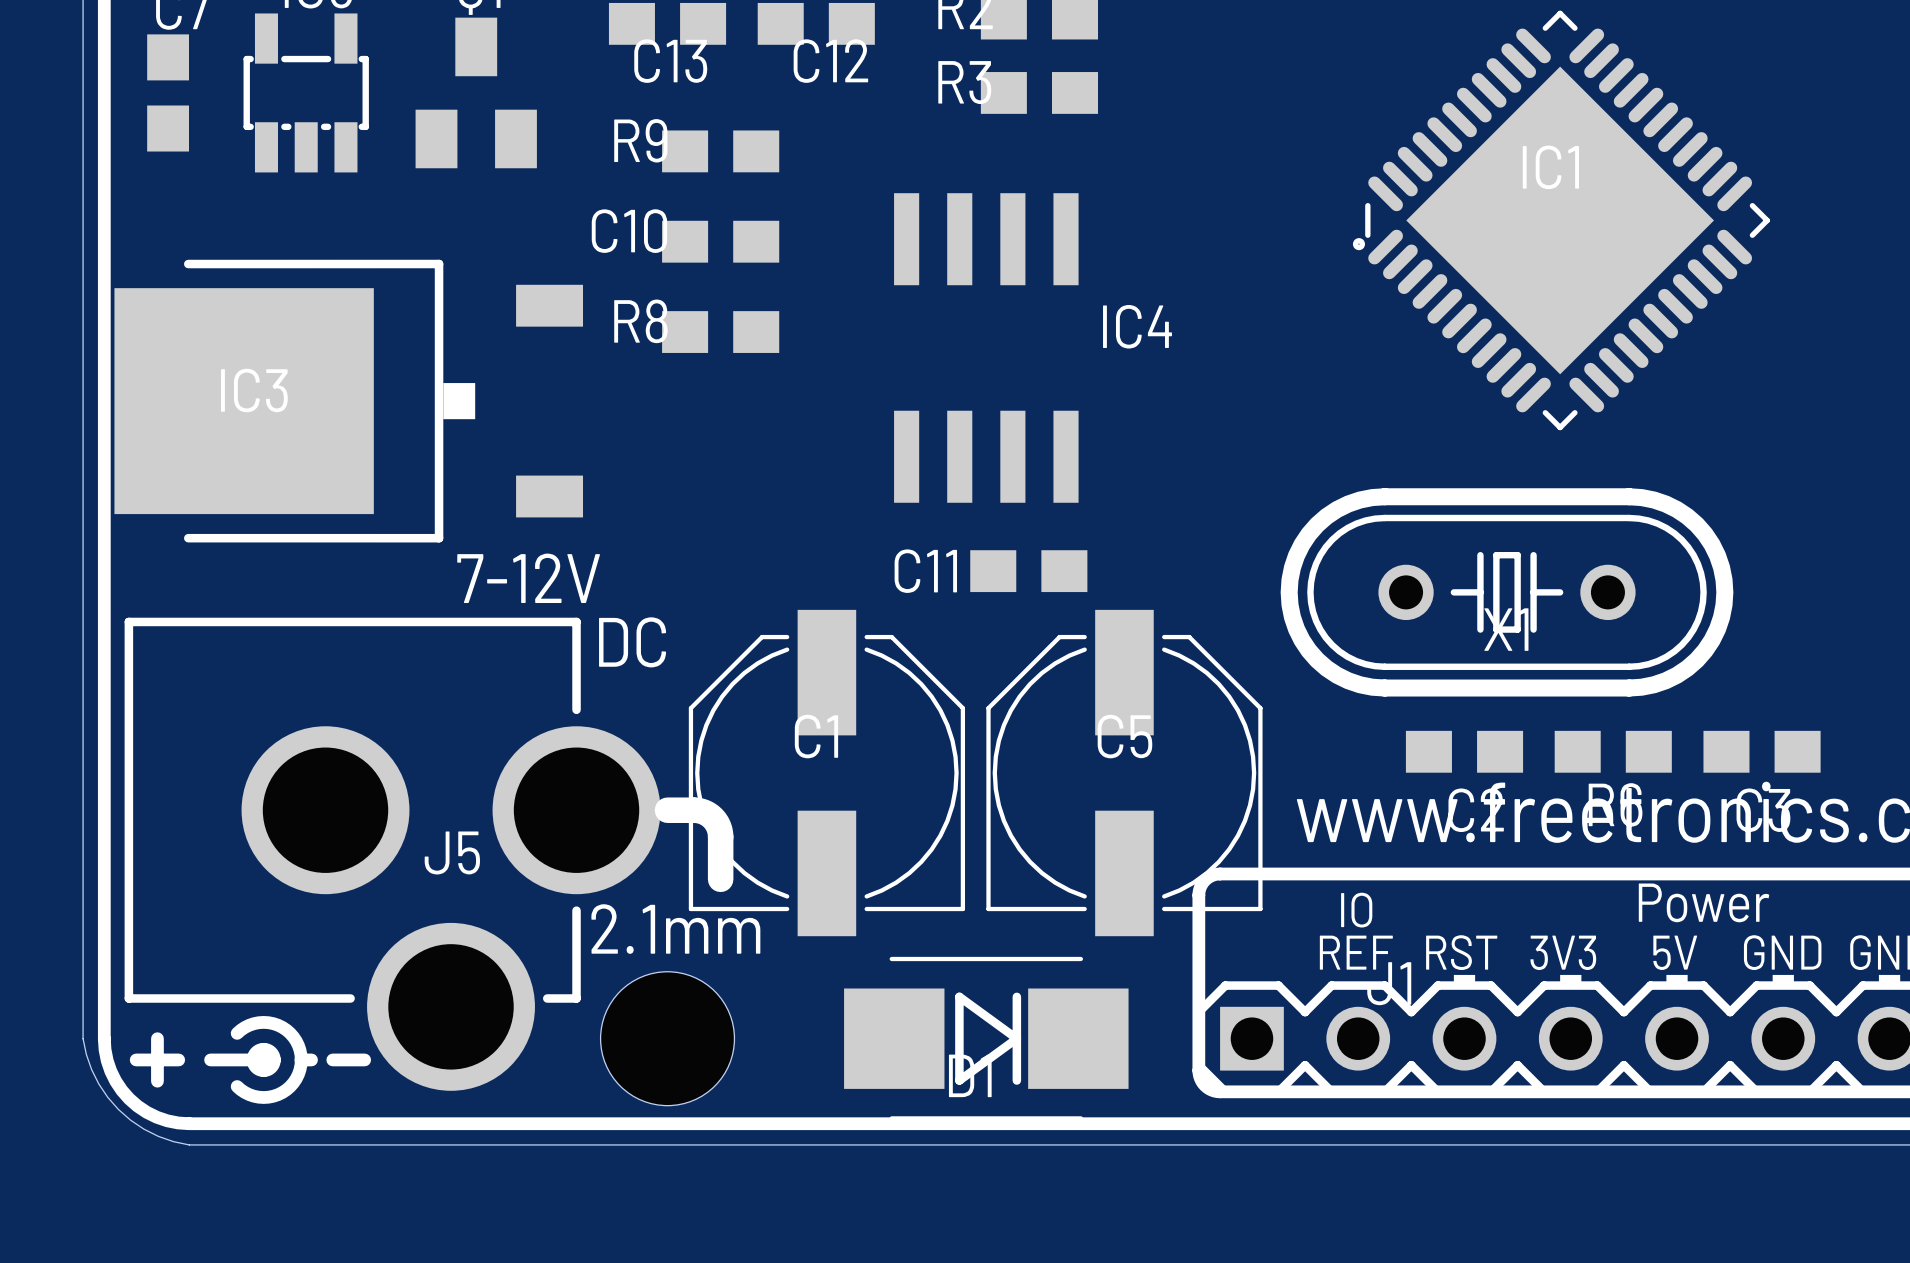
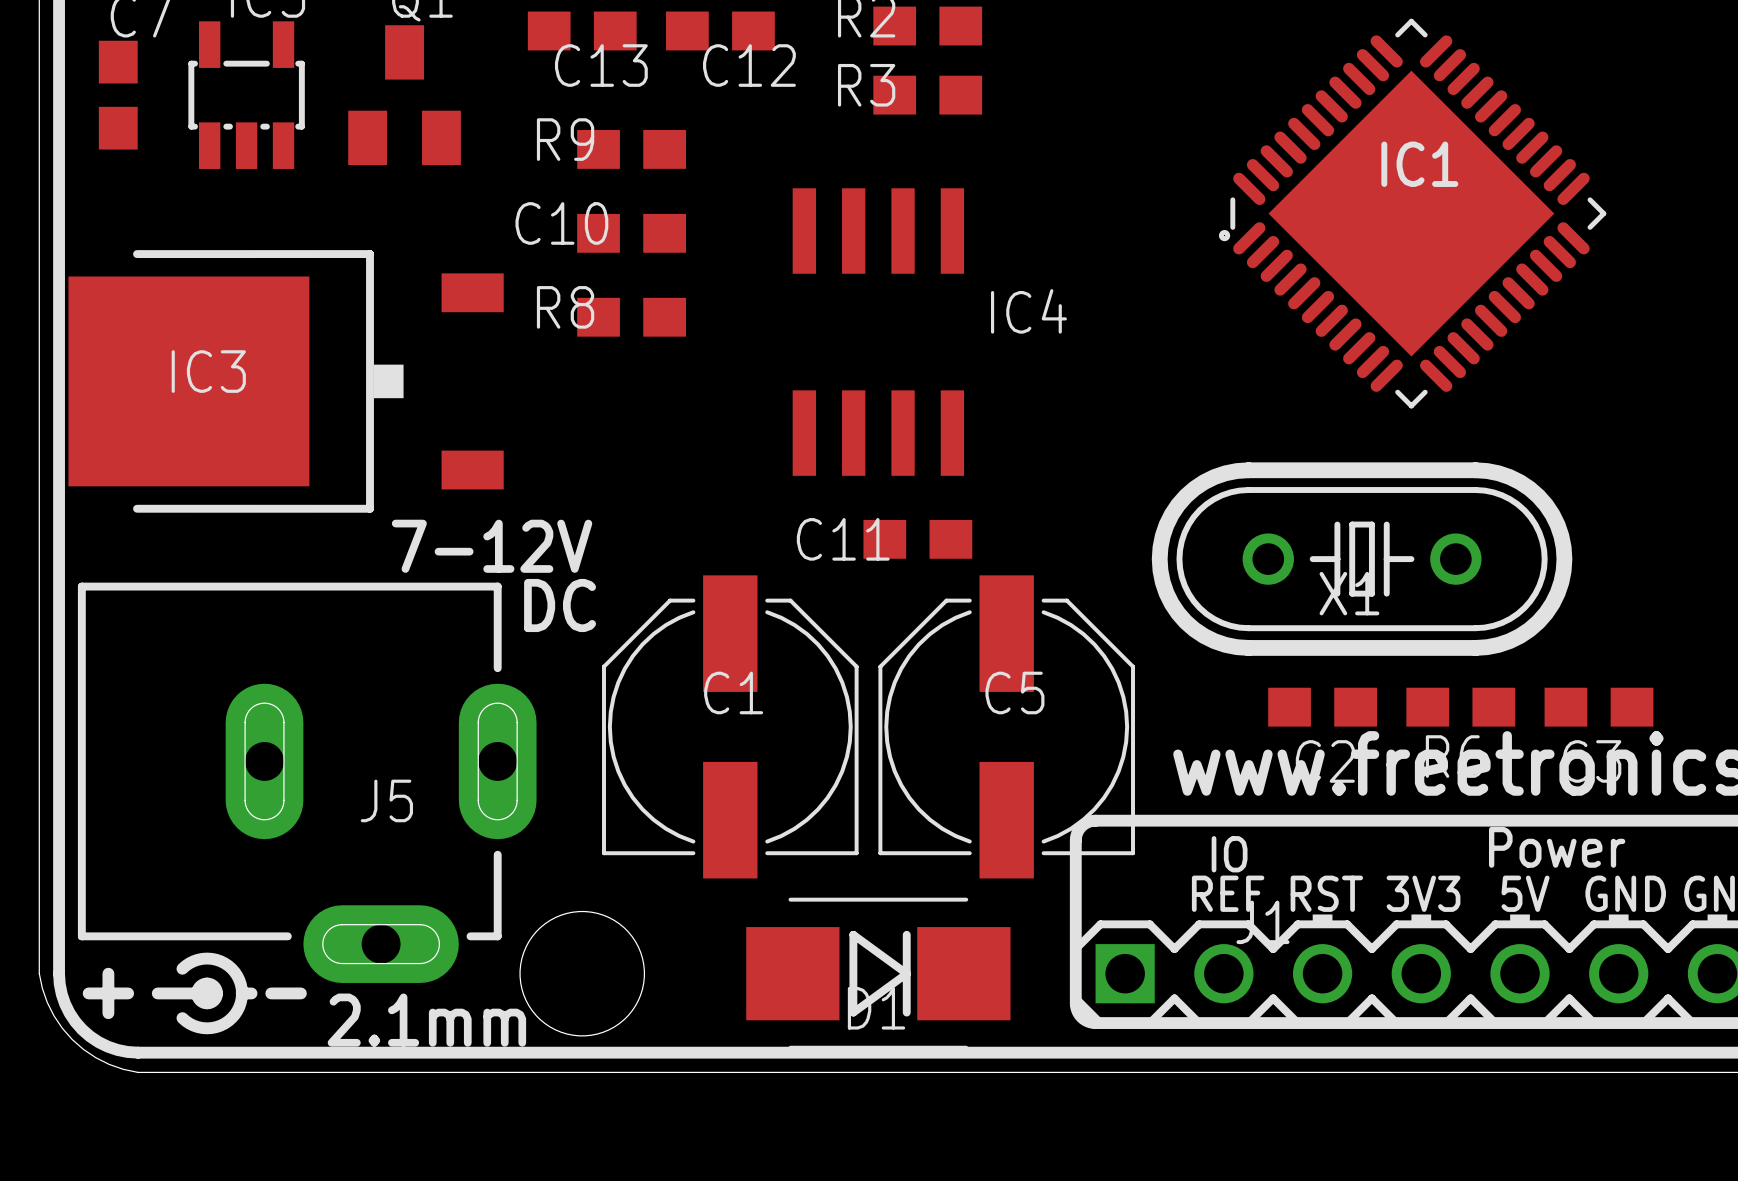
J5 footprint: [124, 617, 661, 1091] -> [77, 582, 537, 983]
line: (667, 810) (700, 811) (715, 820) (720, 833) (720, 879) -> none
text position: 2.1mm (675, 929) -> 2.1mm (426, 1020)

